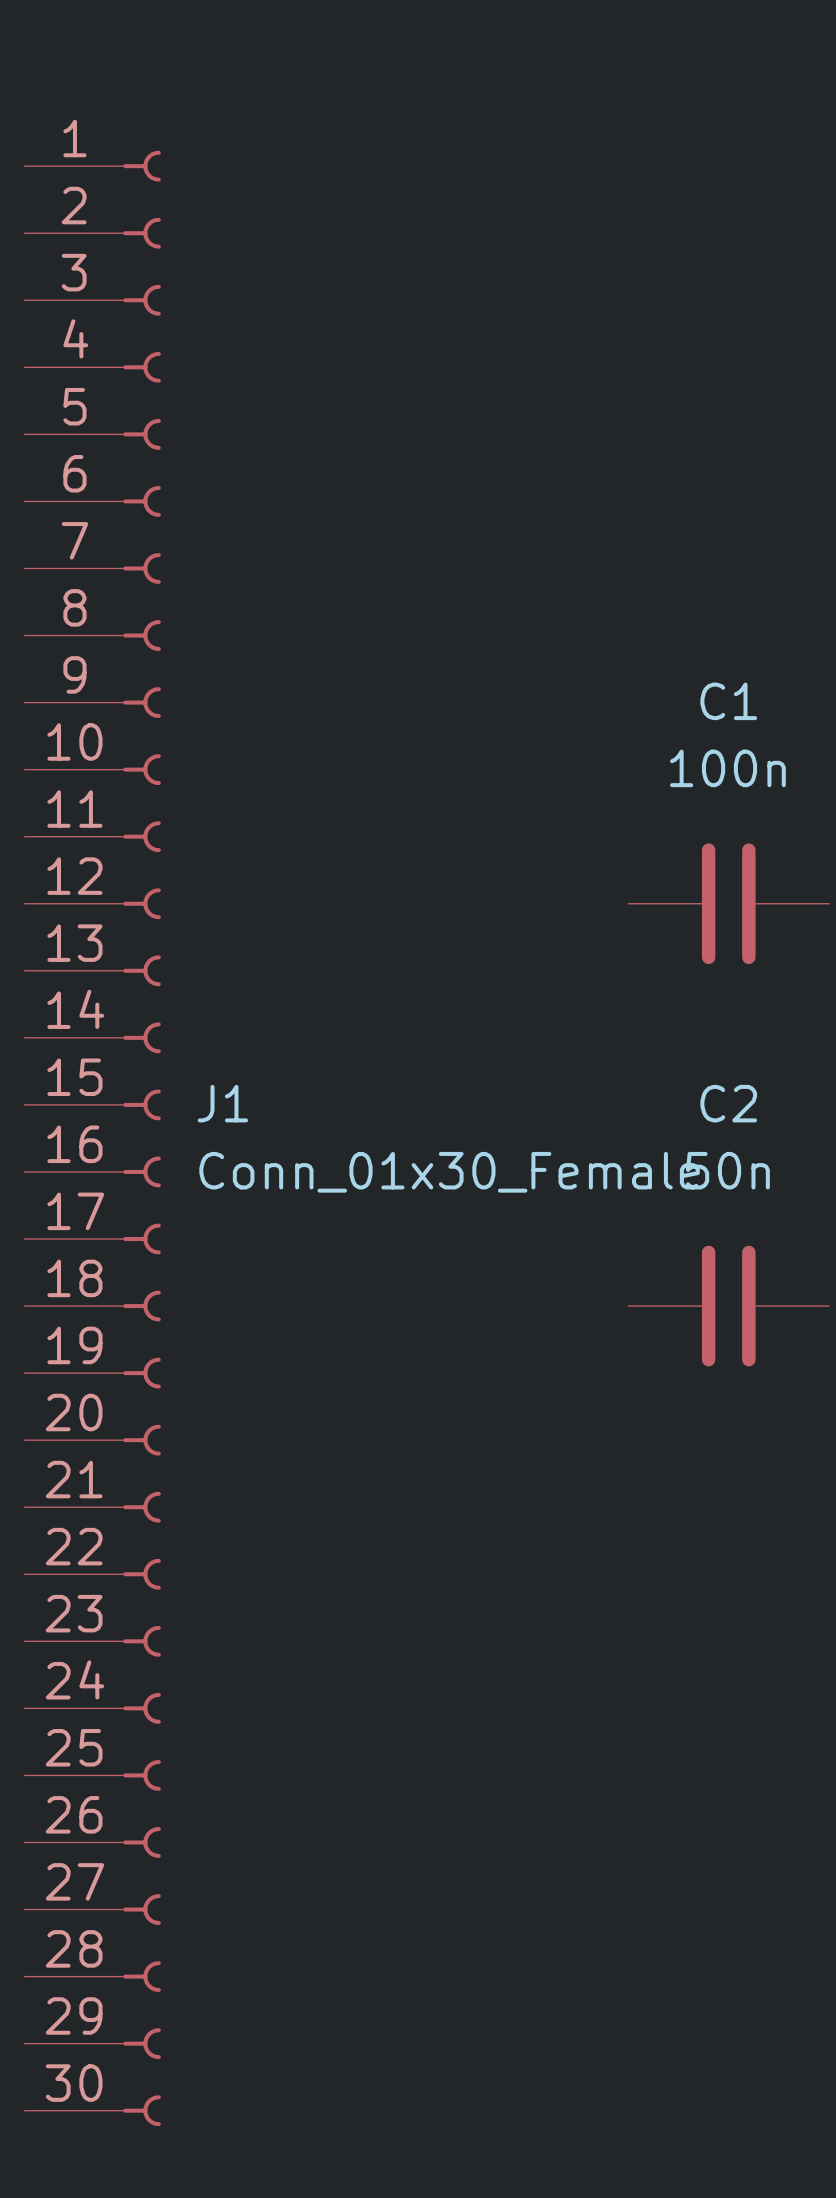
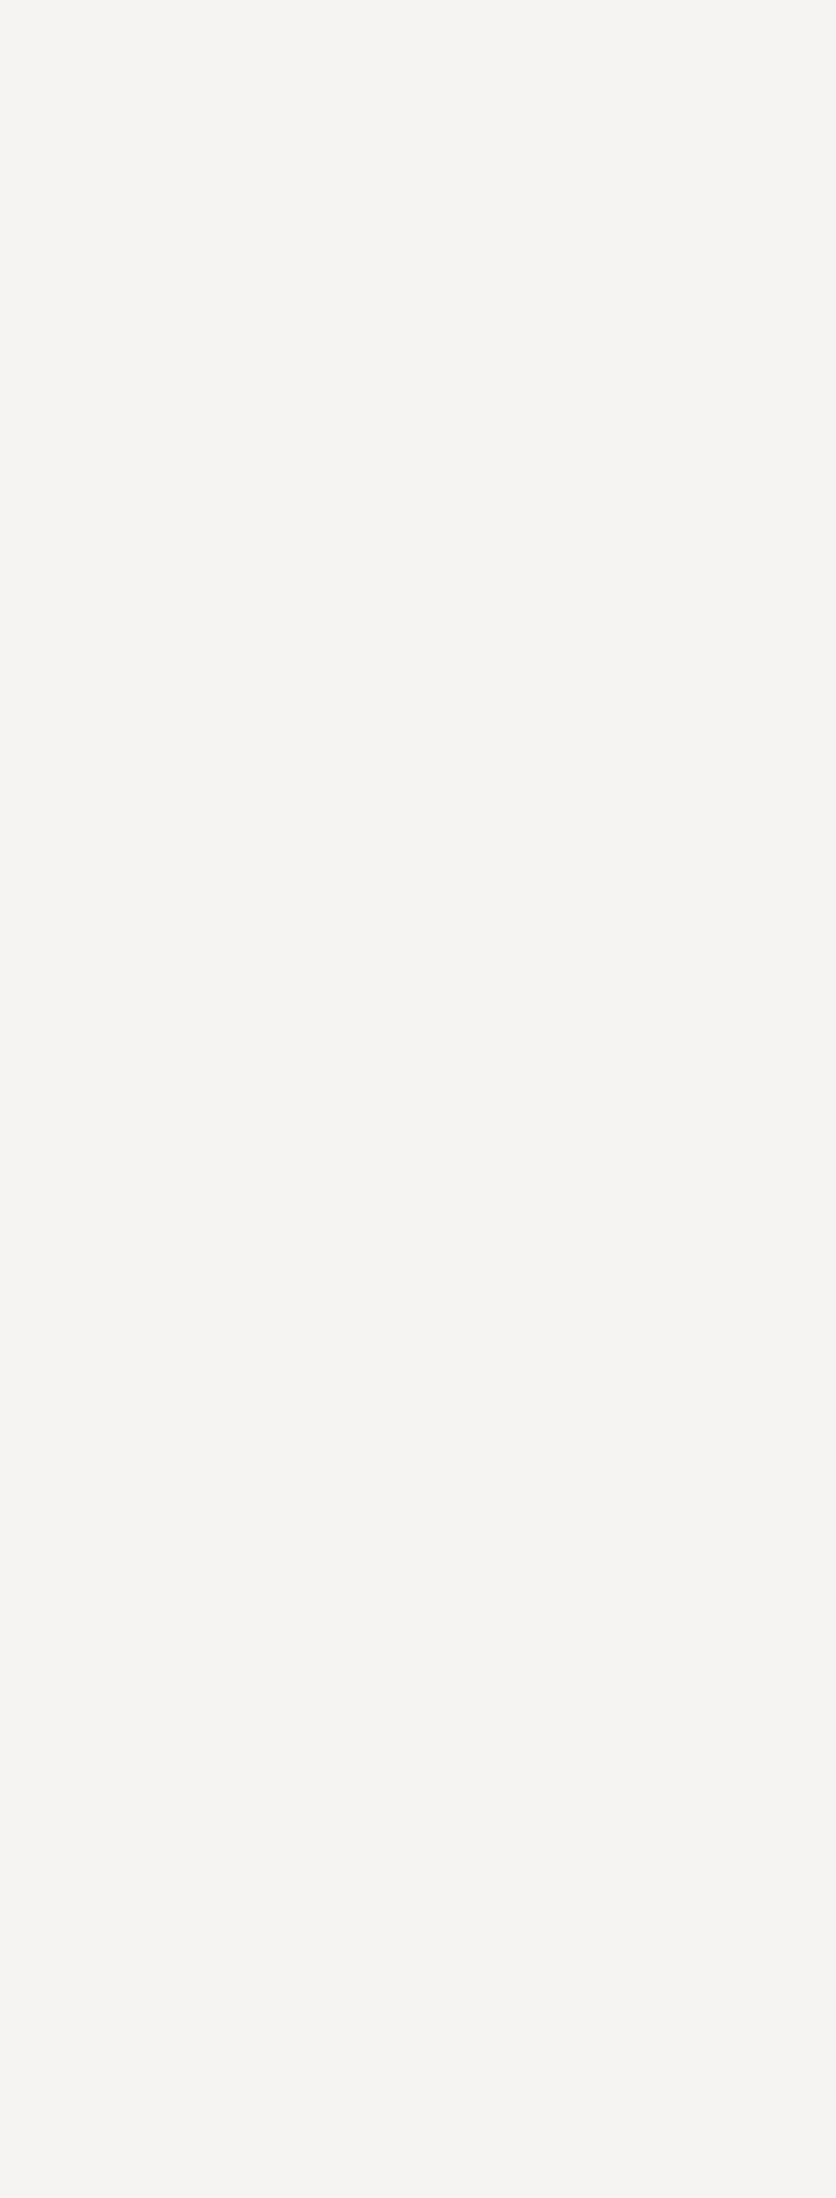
C1: 100n (728, 903) -> none
J1: Conn_01x30_Female (92, 1138) -> none
C2: 50n (728, 1306) -> none

